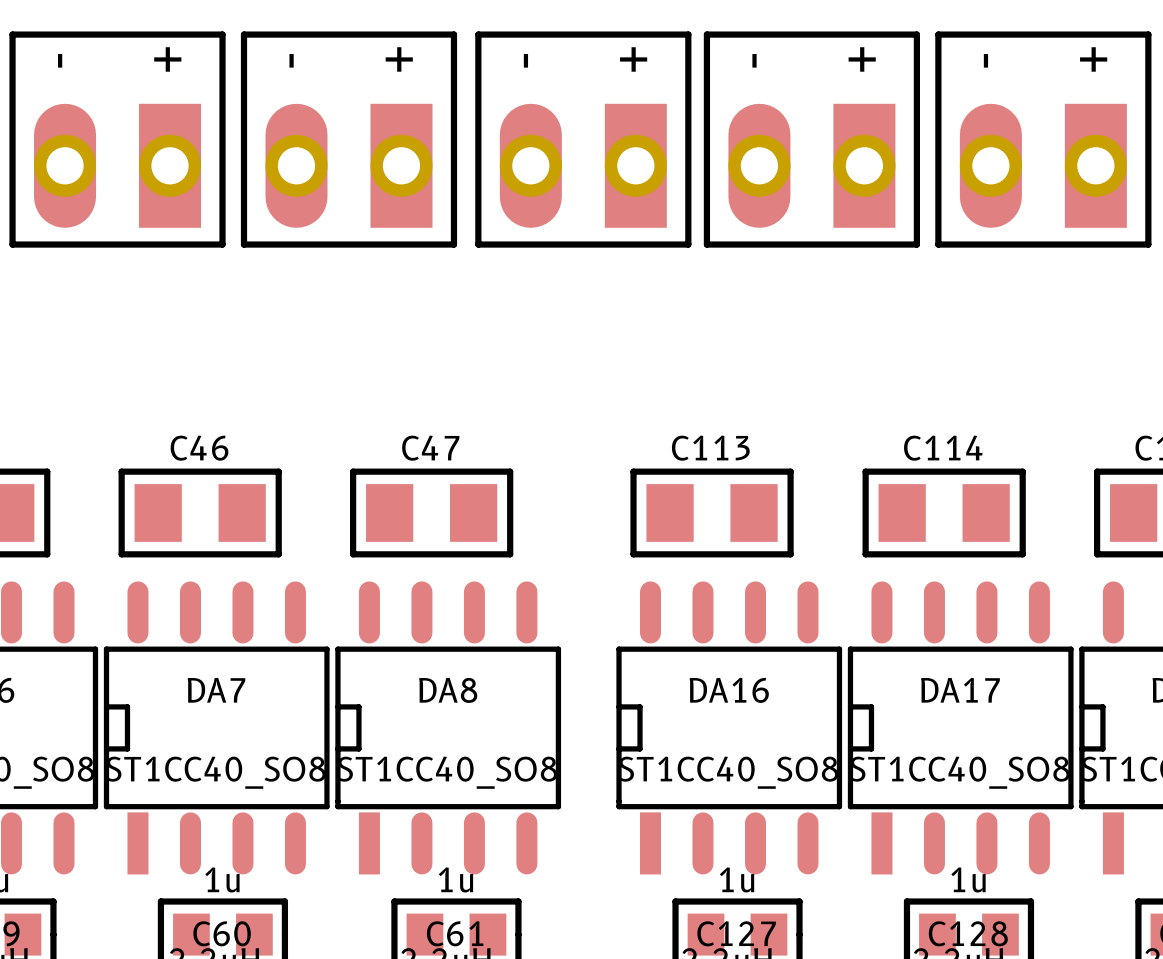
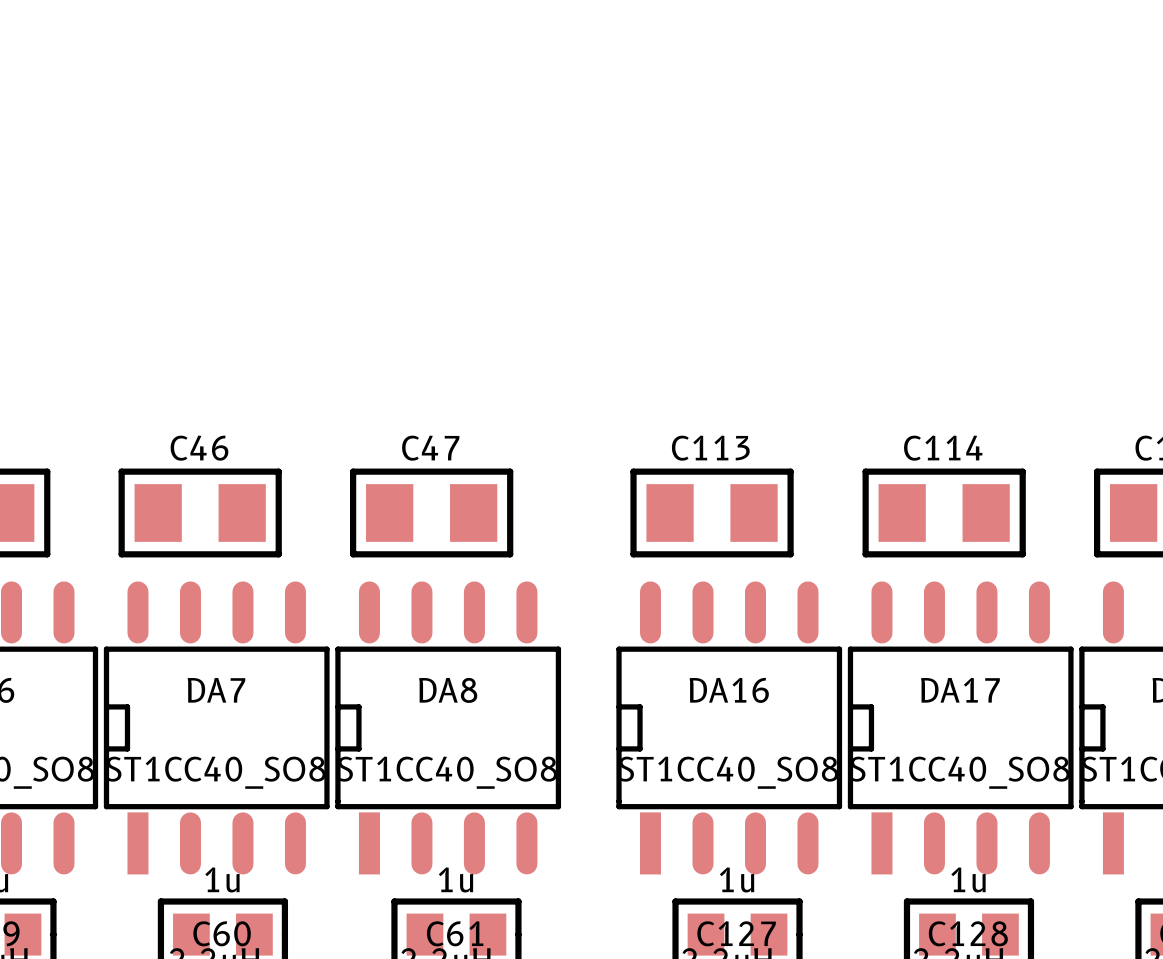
part: (117, 139) -> none
part: (348, 139) -> none
part: (583, 139) -> none
part: (811, 139) -> none
part: (1043, 139) -> none

